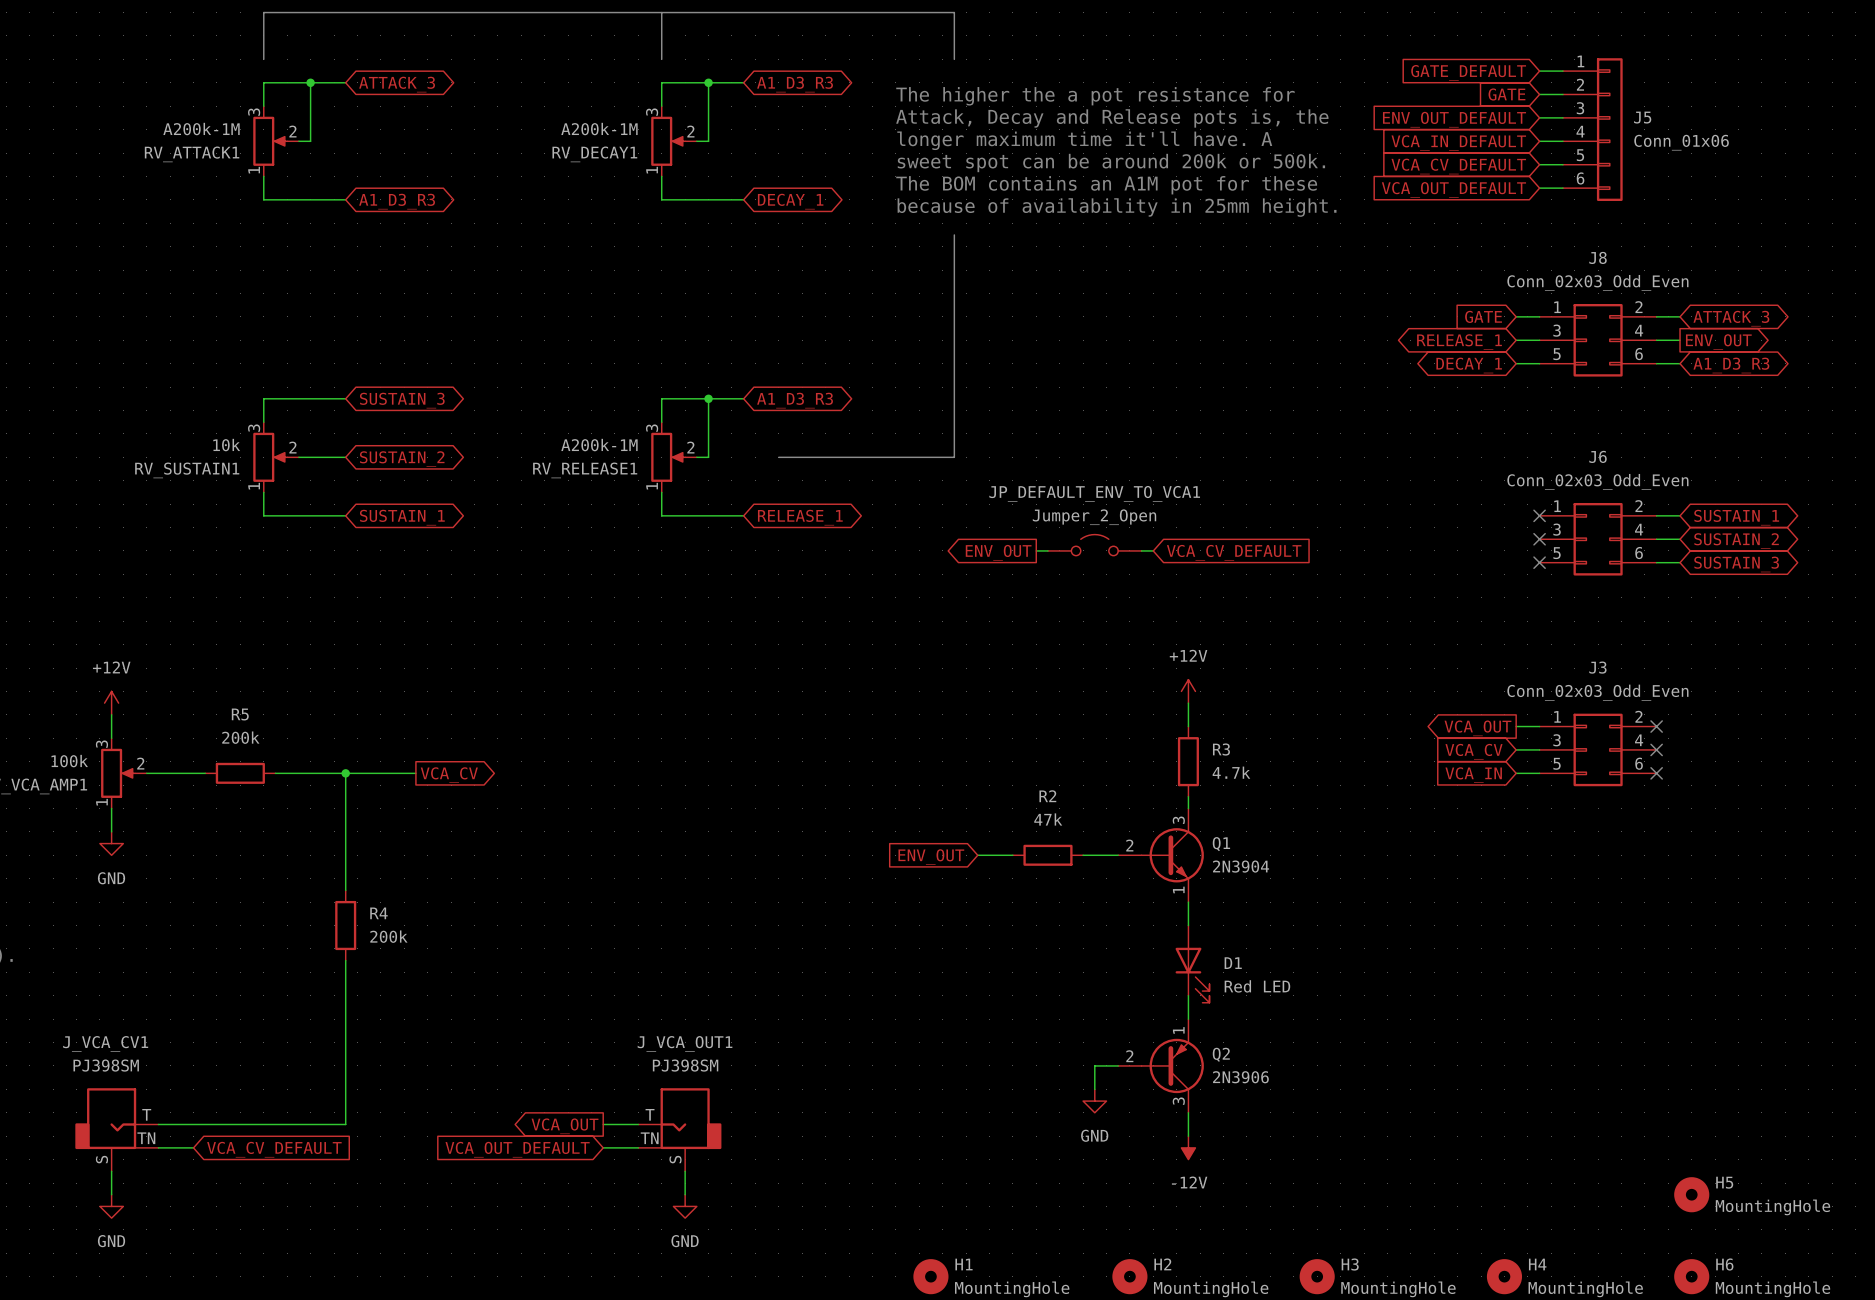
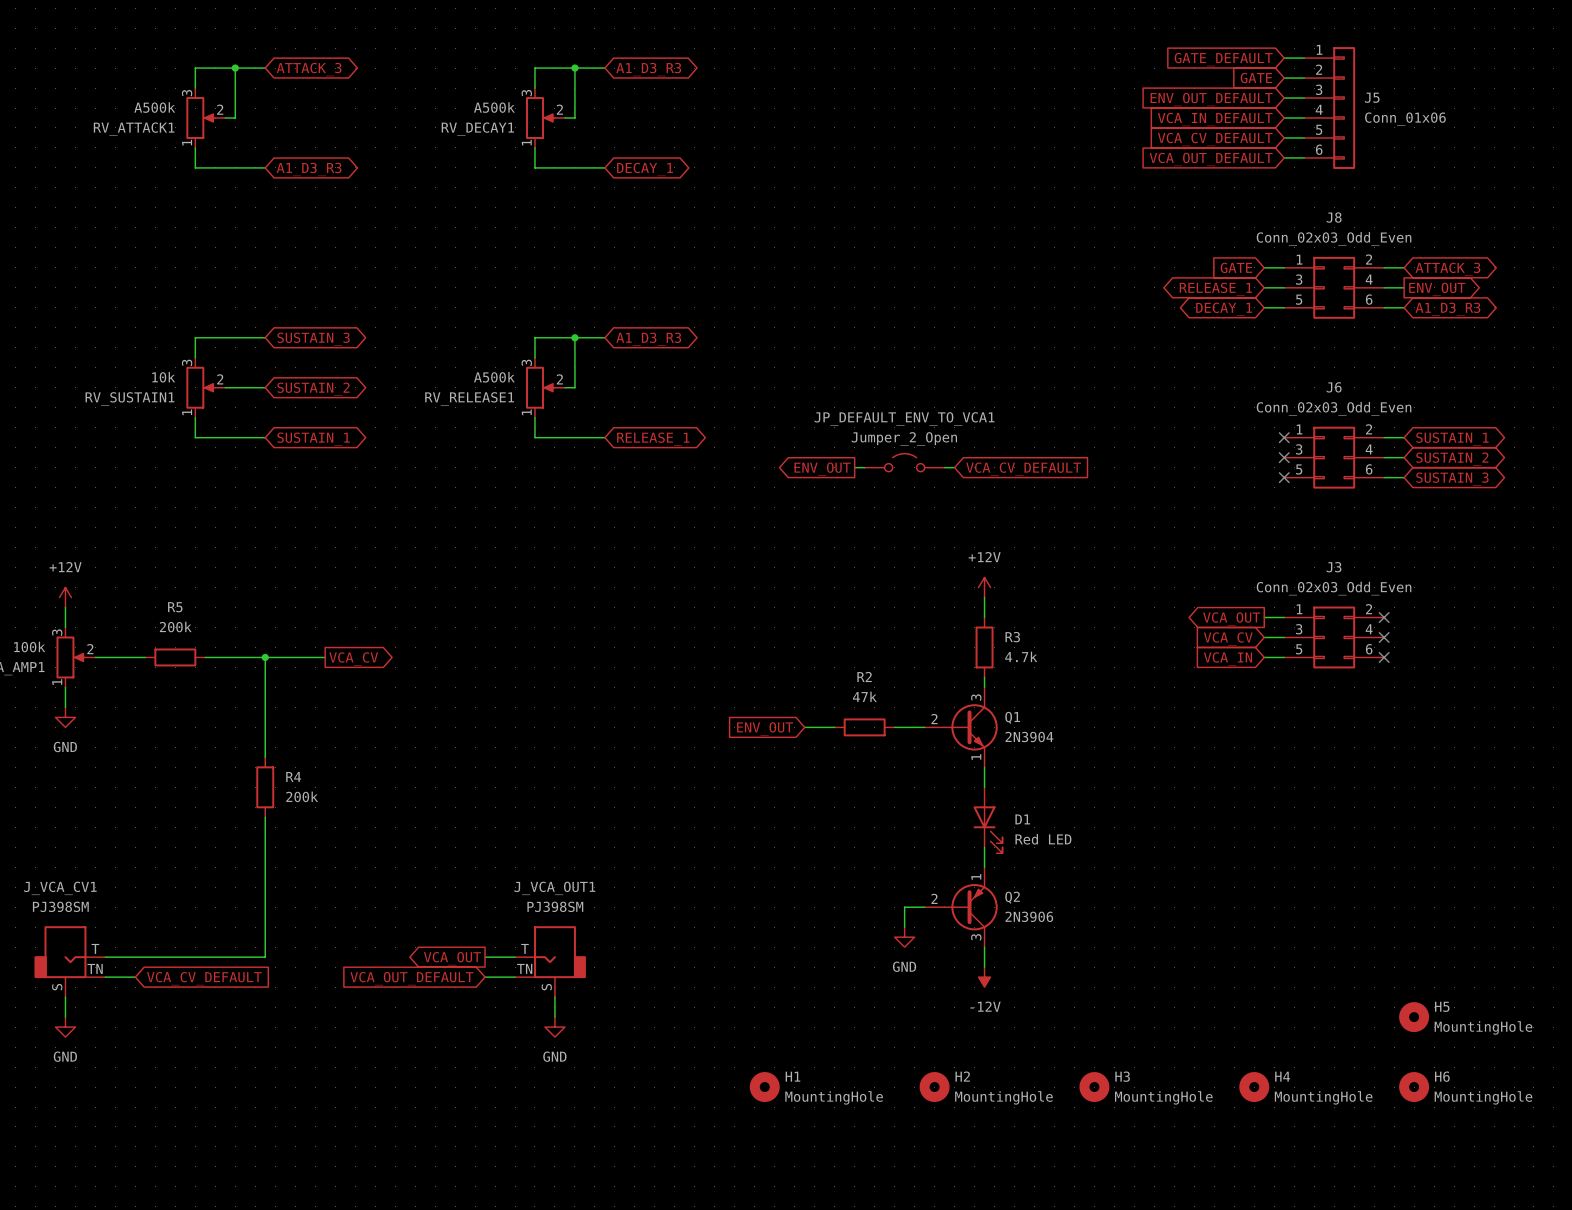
line: (661, 12) (661, 59) -> none
line: (263, 59) (263, 12) (954, 12) (954, 59) -> none
text: The higher the a pot resistance for (1095, 96) -> none
text: Attack, Decay and Release pots is, the (1112, 118) -> none
RV_ATTACK1 value: A200k-1M (201, 129) -> A500k (154, 107)
RV_DECAY1 value: A200k-1M (599, 129) -> A500k (494, 107)
text: longer maximum time it'll have. A (1084, 140) -> none
text: sweet spot can be around 200k or 500k. (1111, 163) -> none
text: The BOM contains an A1M pot for these (1106, 185) -> none
text: because of availability in 25mm height. (1117, 207) -> none
line: (954, 234) (954, 457) (778, 457) -> none
RV_RELEASE1 value: A200k-1M (599, 445) -> A500k (494, 377)

